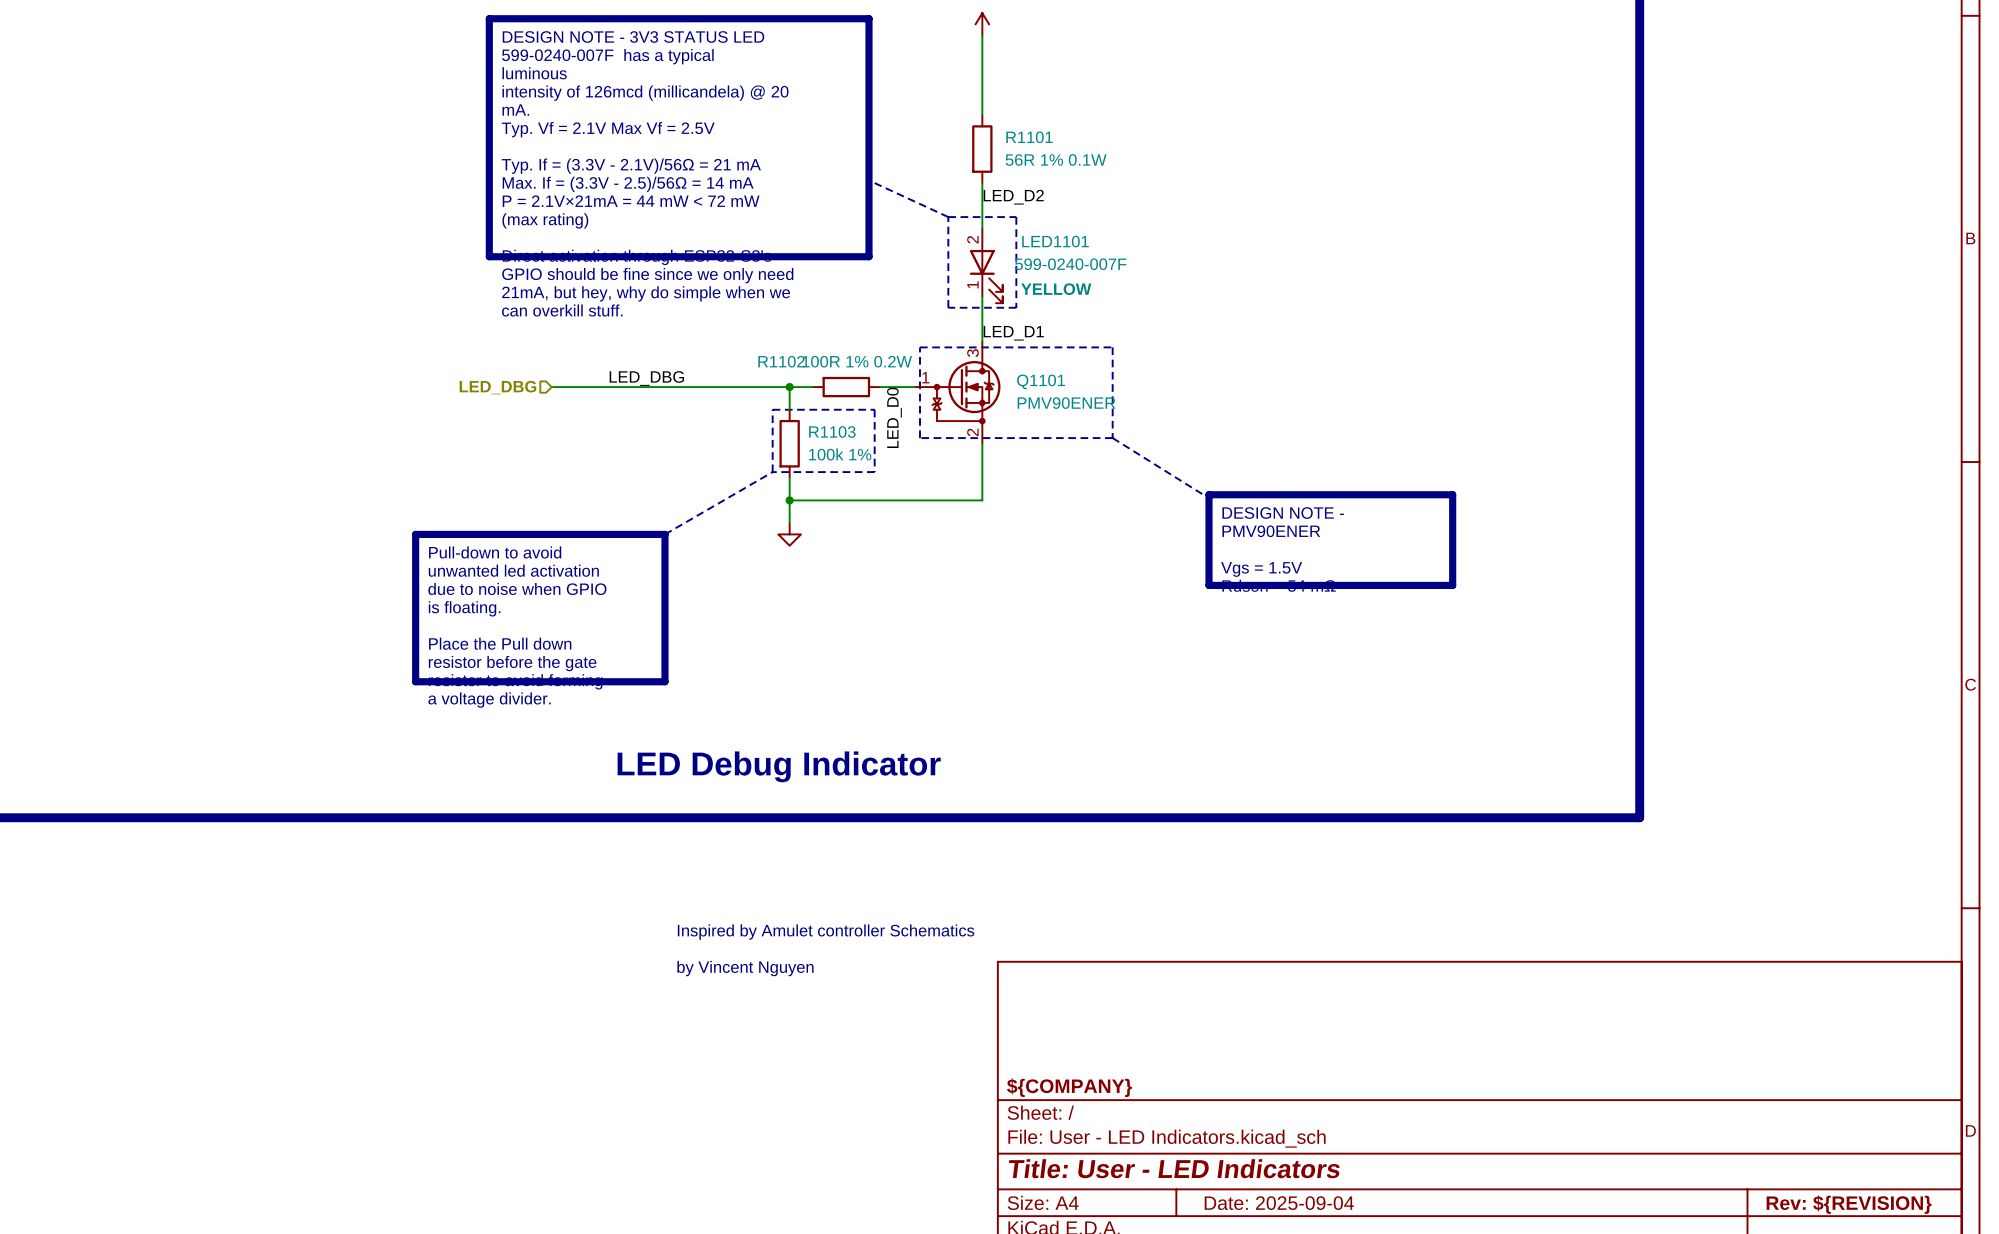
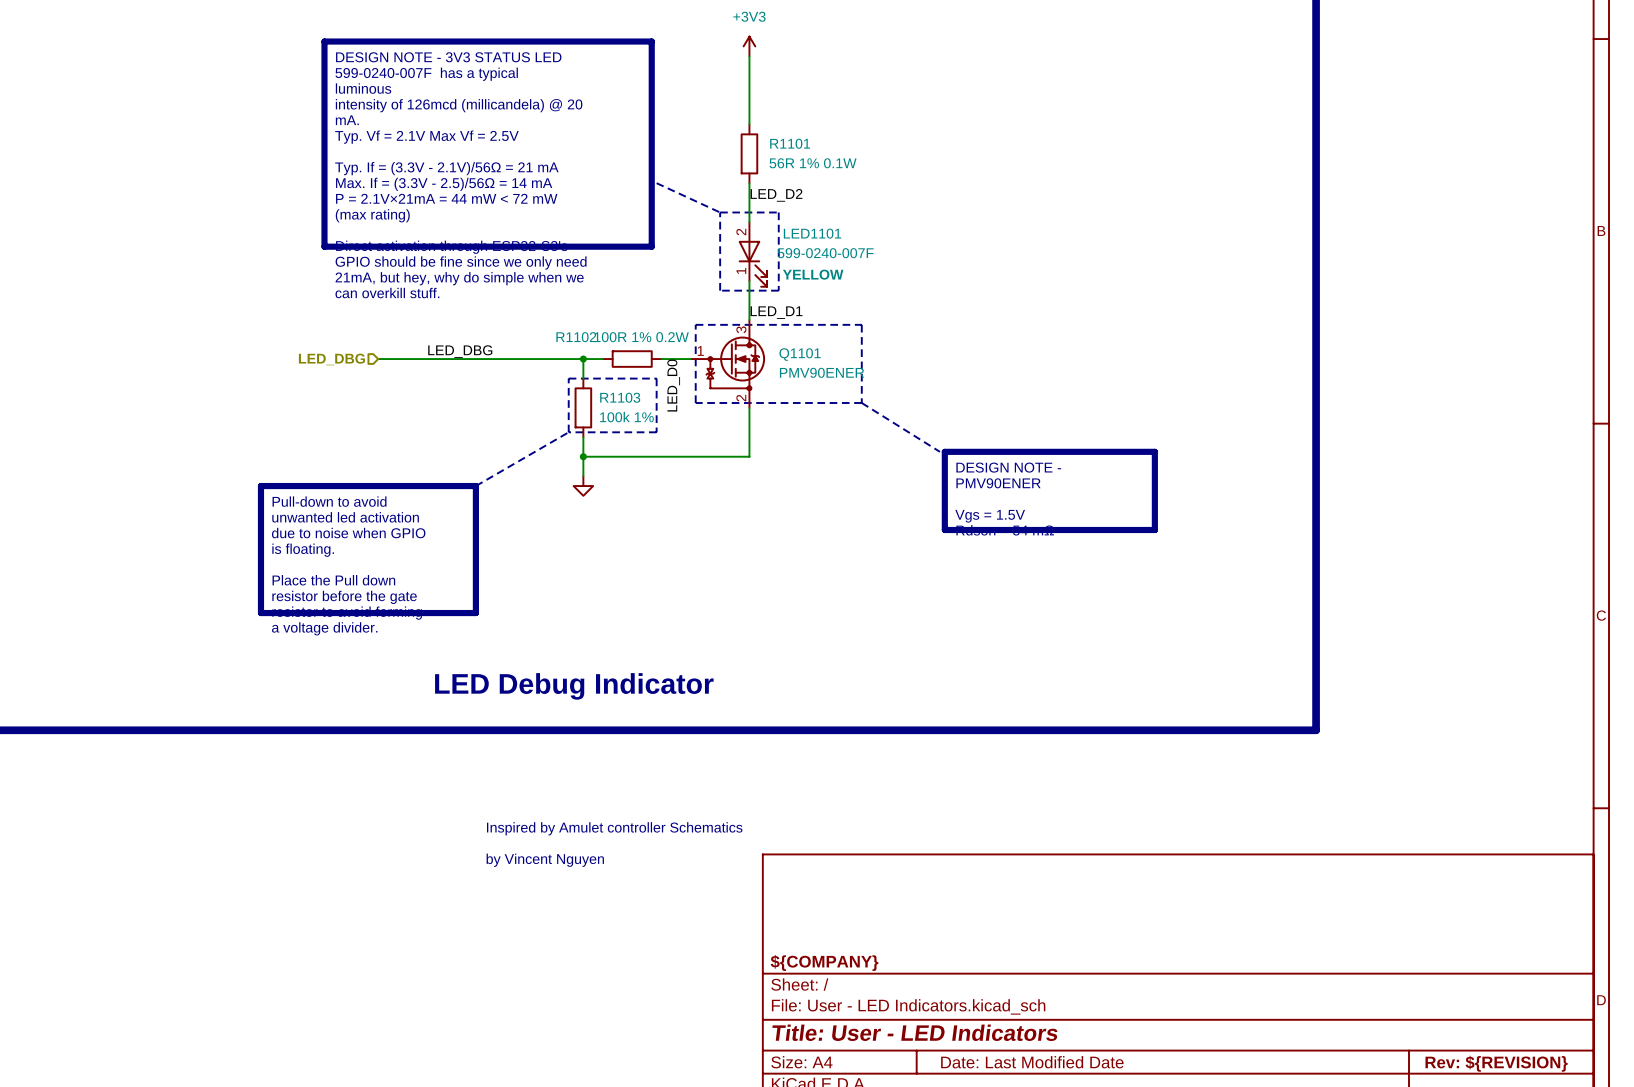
title block: Date: 2025-09-04 (1279, 1203) -> Date: Last Modified Date (1032, 1062)

